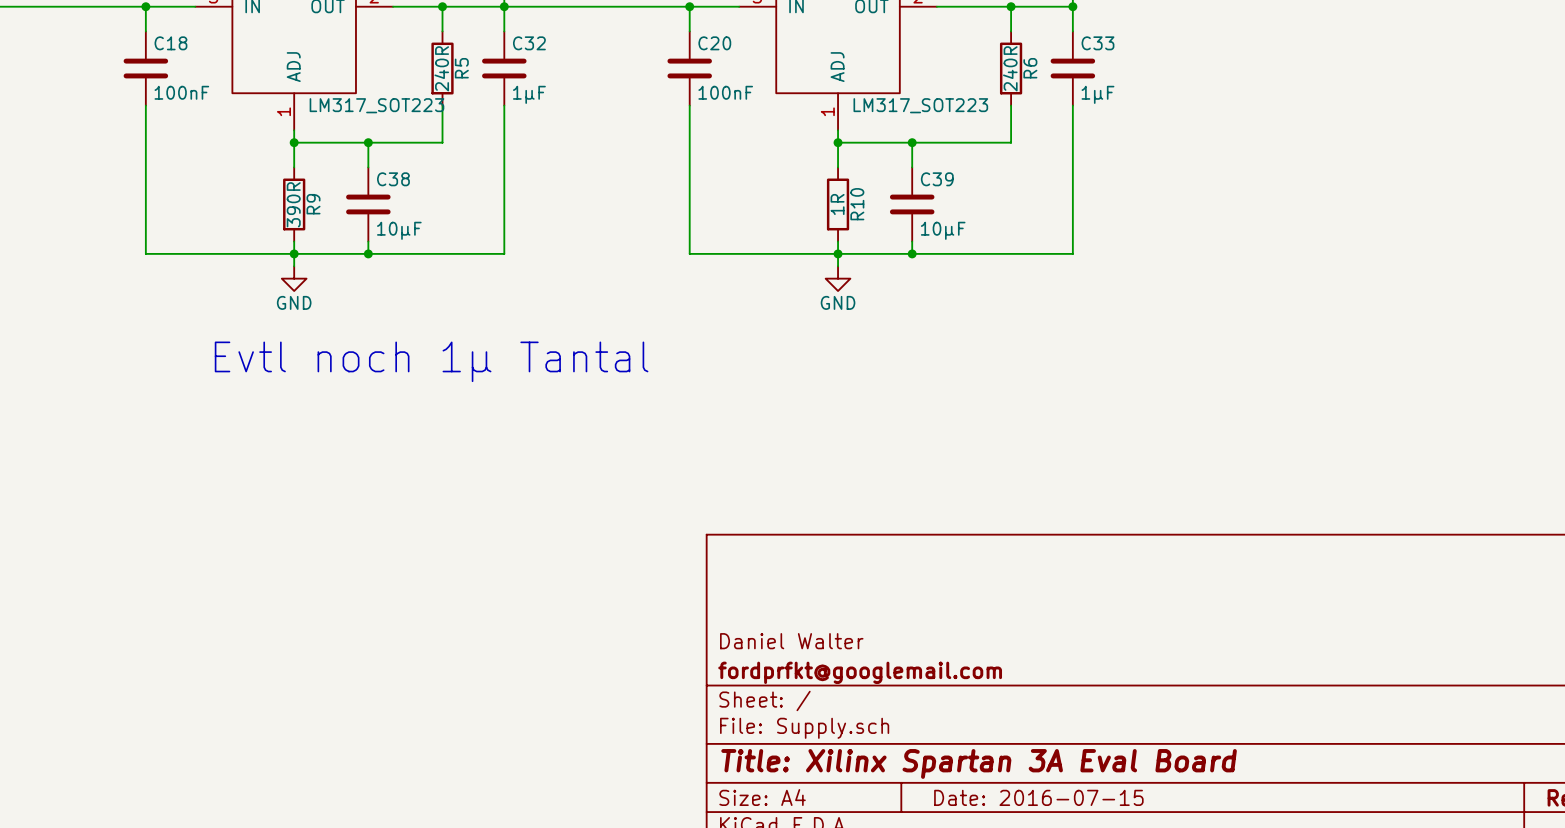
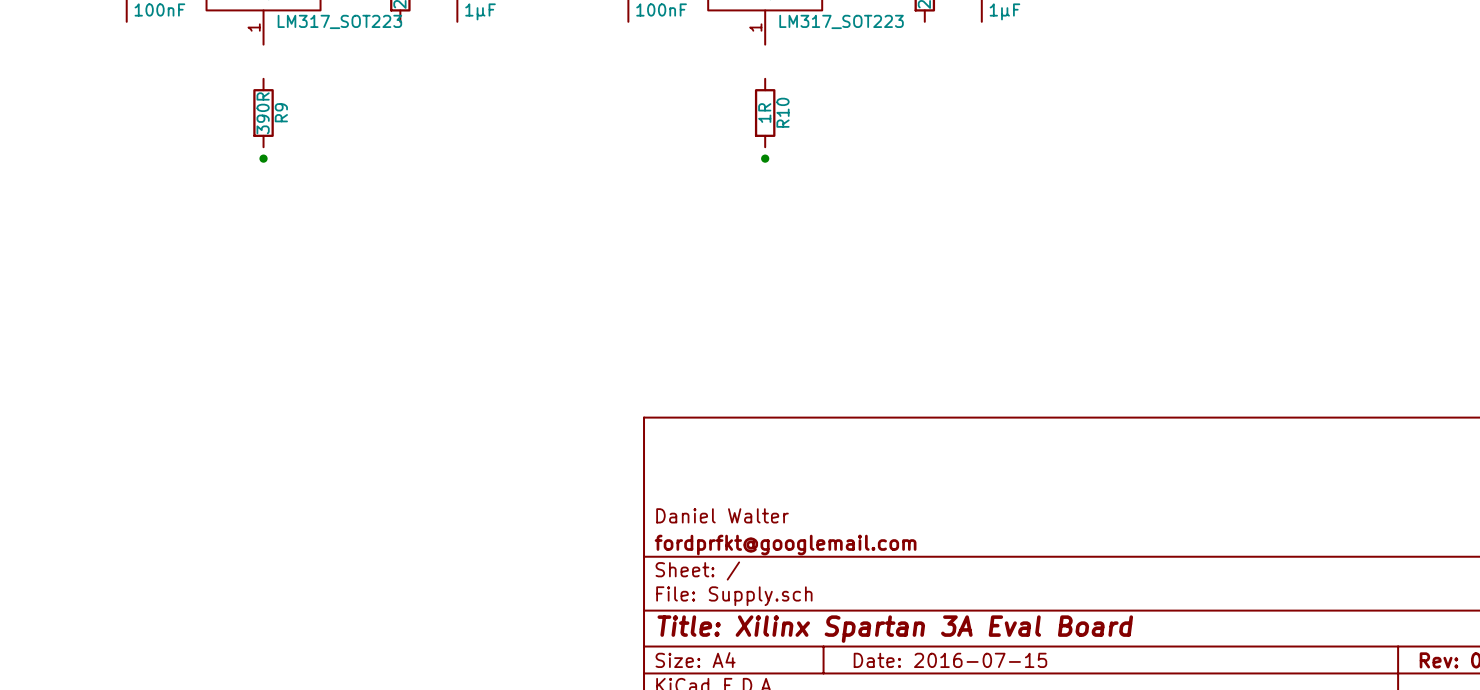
wire: (145, 105) (145, 253) (504, 253) (504, 105) -> none
wire: (442, 105) (442, 142) (294, 142) -> none
wire: (689, 105) (689, 253) (1072, 253) (1072, 105) -> none
wire: (1011, 105) (1011, 142) (838, 142) -> none
wire: (294, 130) (294, 167) -> none
wire: (838, 130) (838, 167) -> none
junction: (294, 142) -> none
wire: (368, 142) (368, 167) -> none
junction: (368, 142) -> none
junction: (838, 142) -> none
wire: (912, 142) (912, 167) -> none
junction: (912, 142) -> none
C38: 10µF (368, 204) -> none
C39: 10µF (912, 204) -> none
wire: (294, 241) (294, 266) -> none
wire: (368, 241) (368, 253) -> none
wire: (838, 241) (838, 266) -> none
wire: (912, 241) (912, 253) -> none
junction: (368, 253) -> none
junction: (912, 253) -> none
power symbol: GND (294, 278) -> none
power symbol: GND (838, 278) -> none
text: Evtl noch 1µ Tantal (431, 361) -> none

